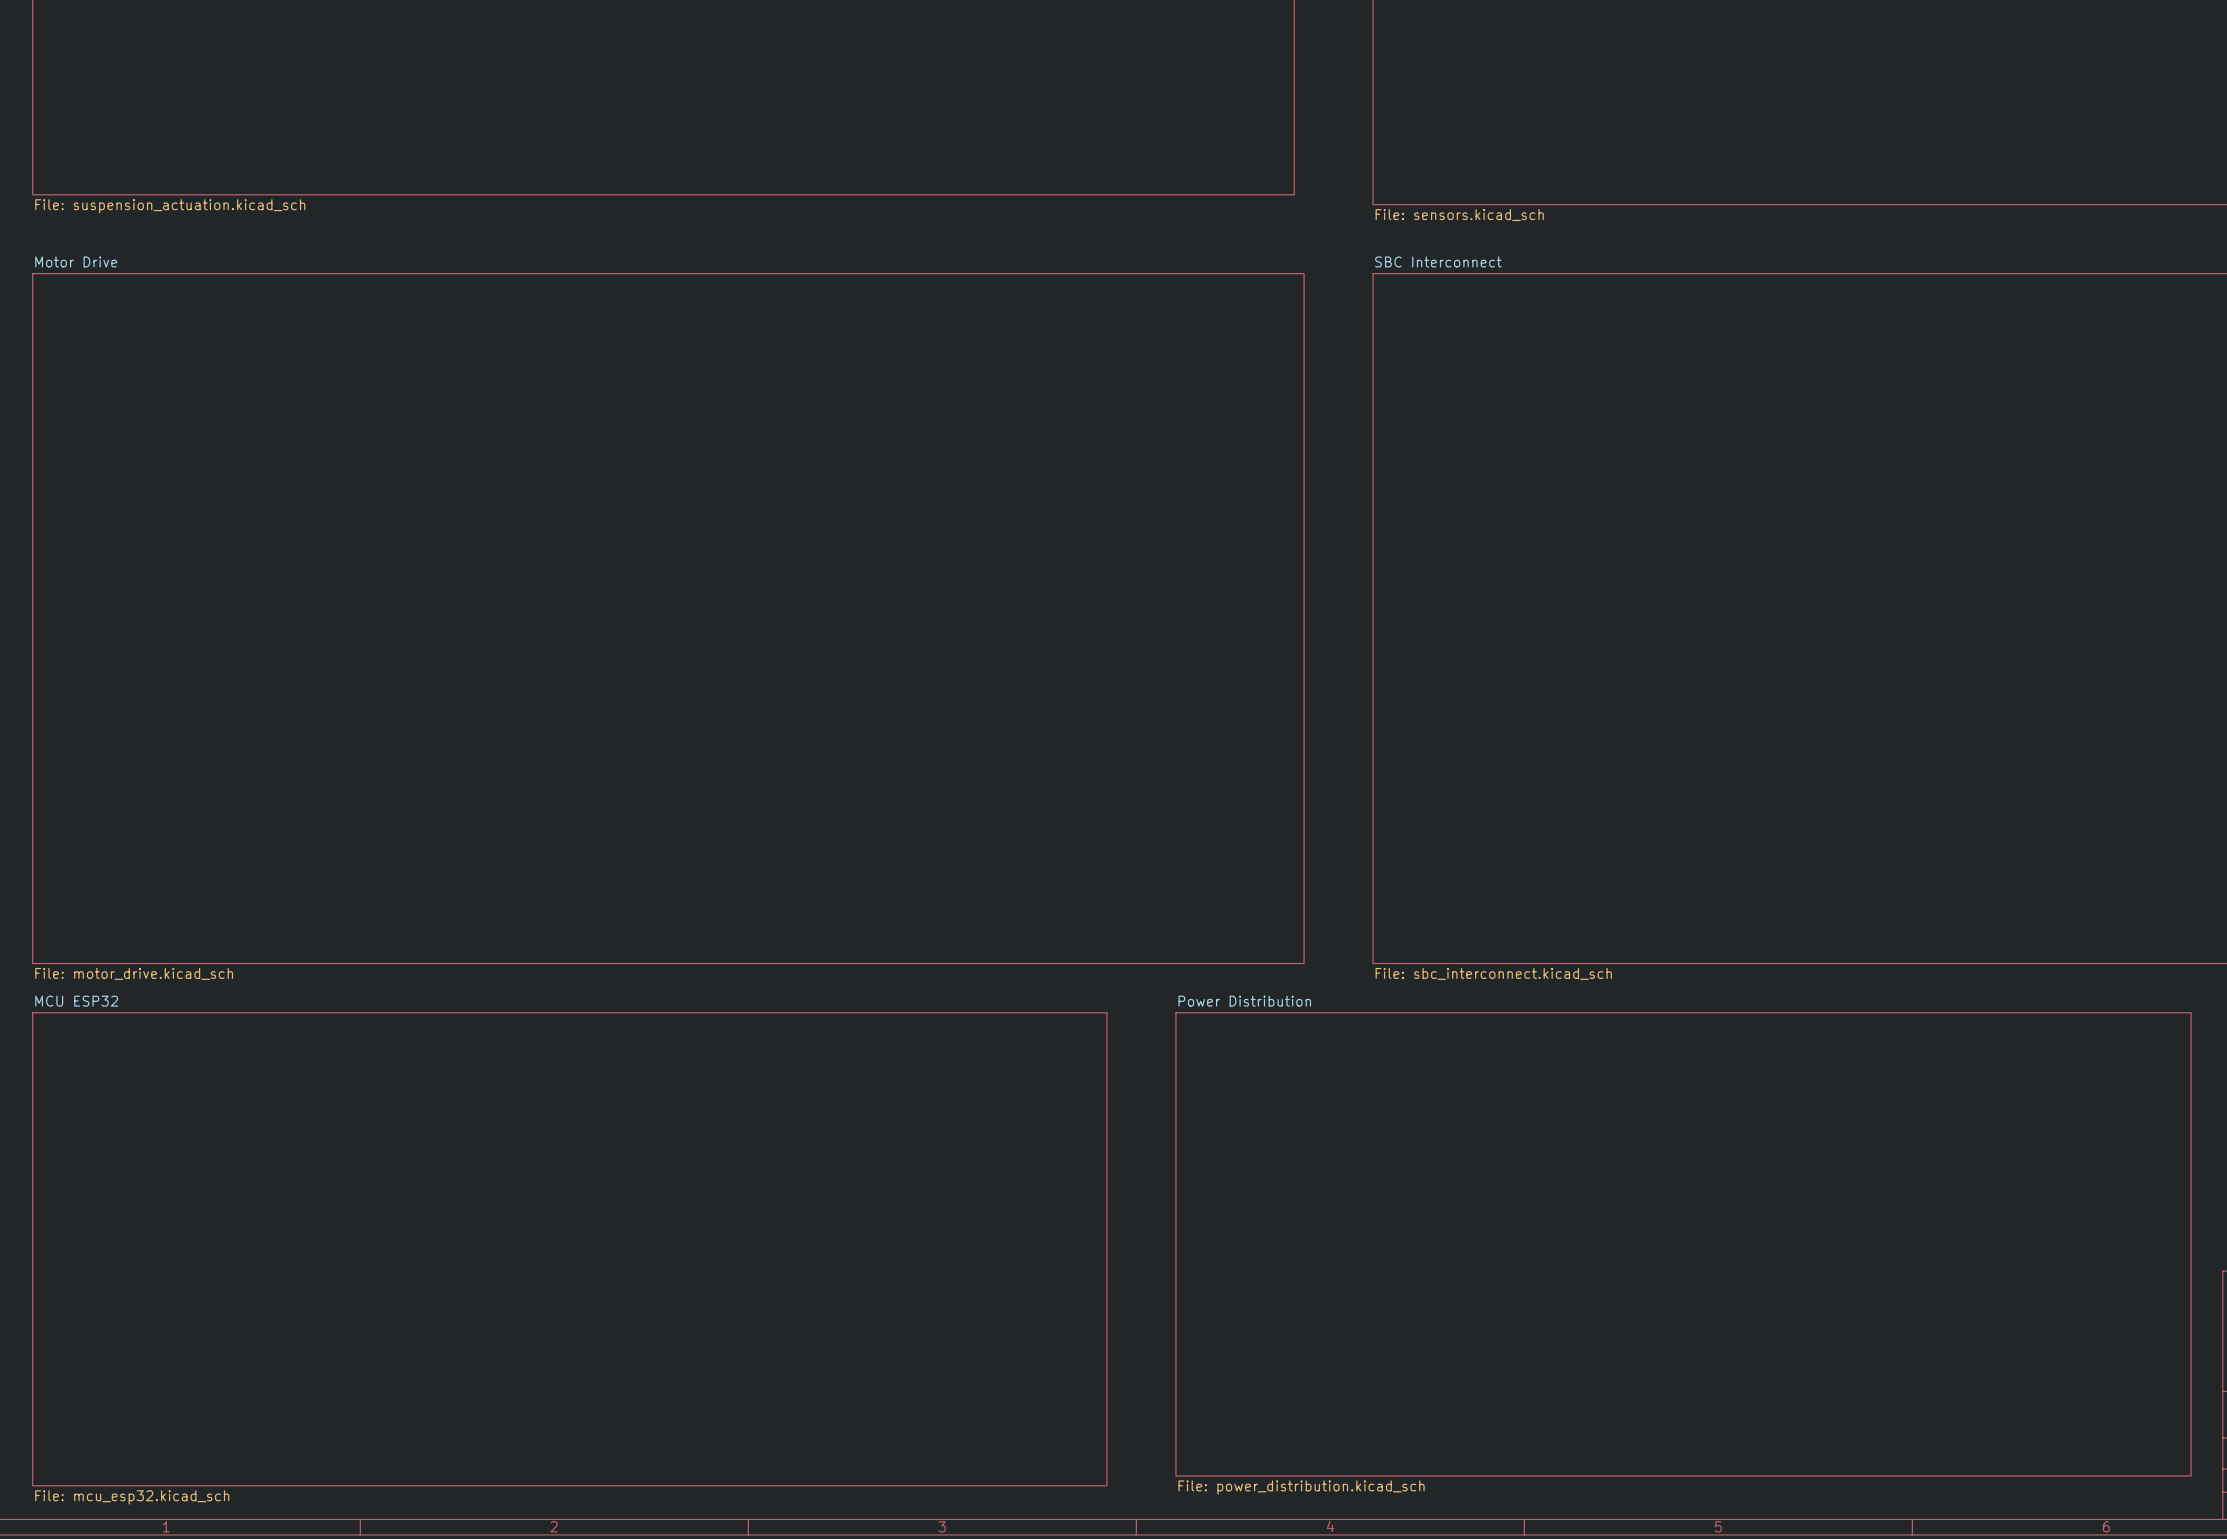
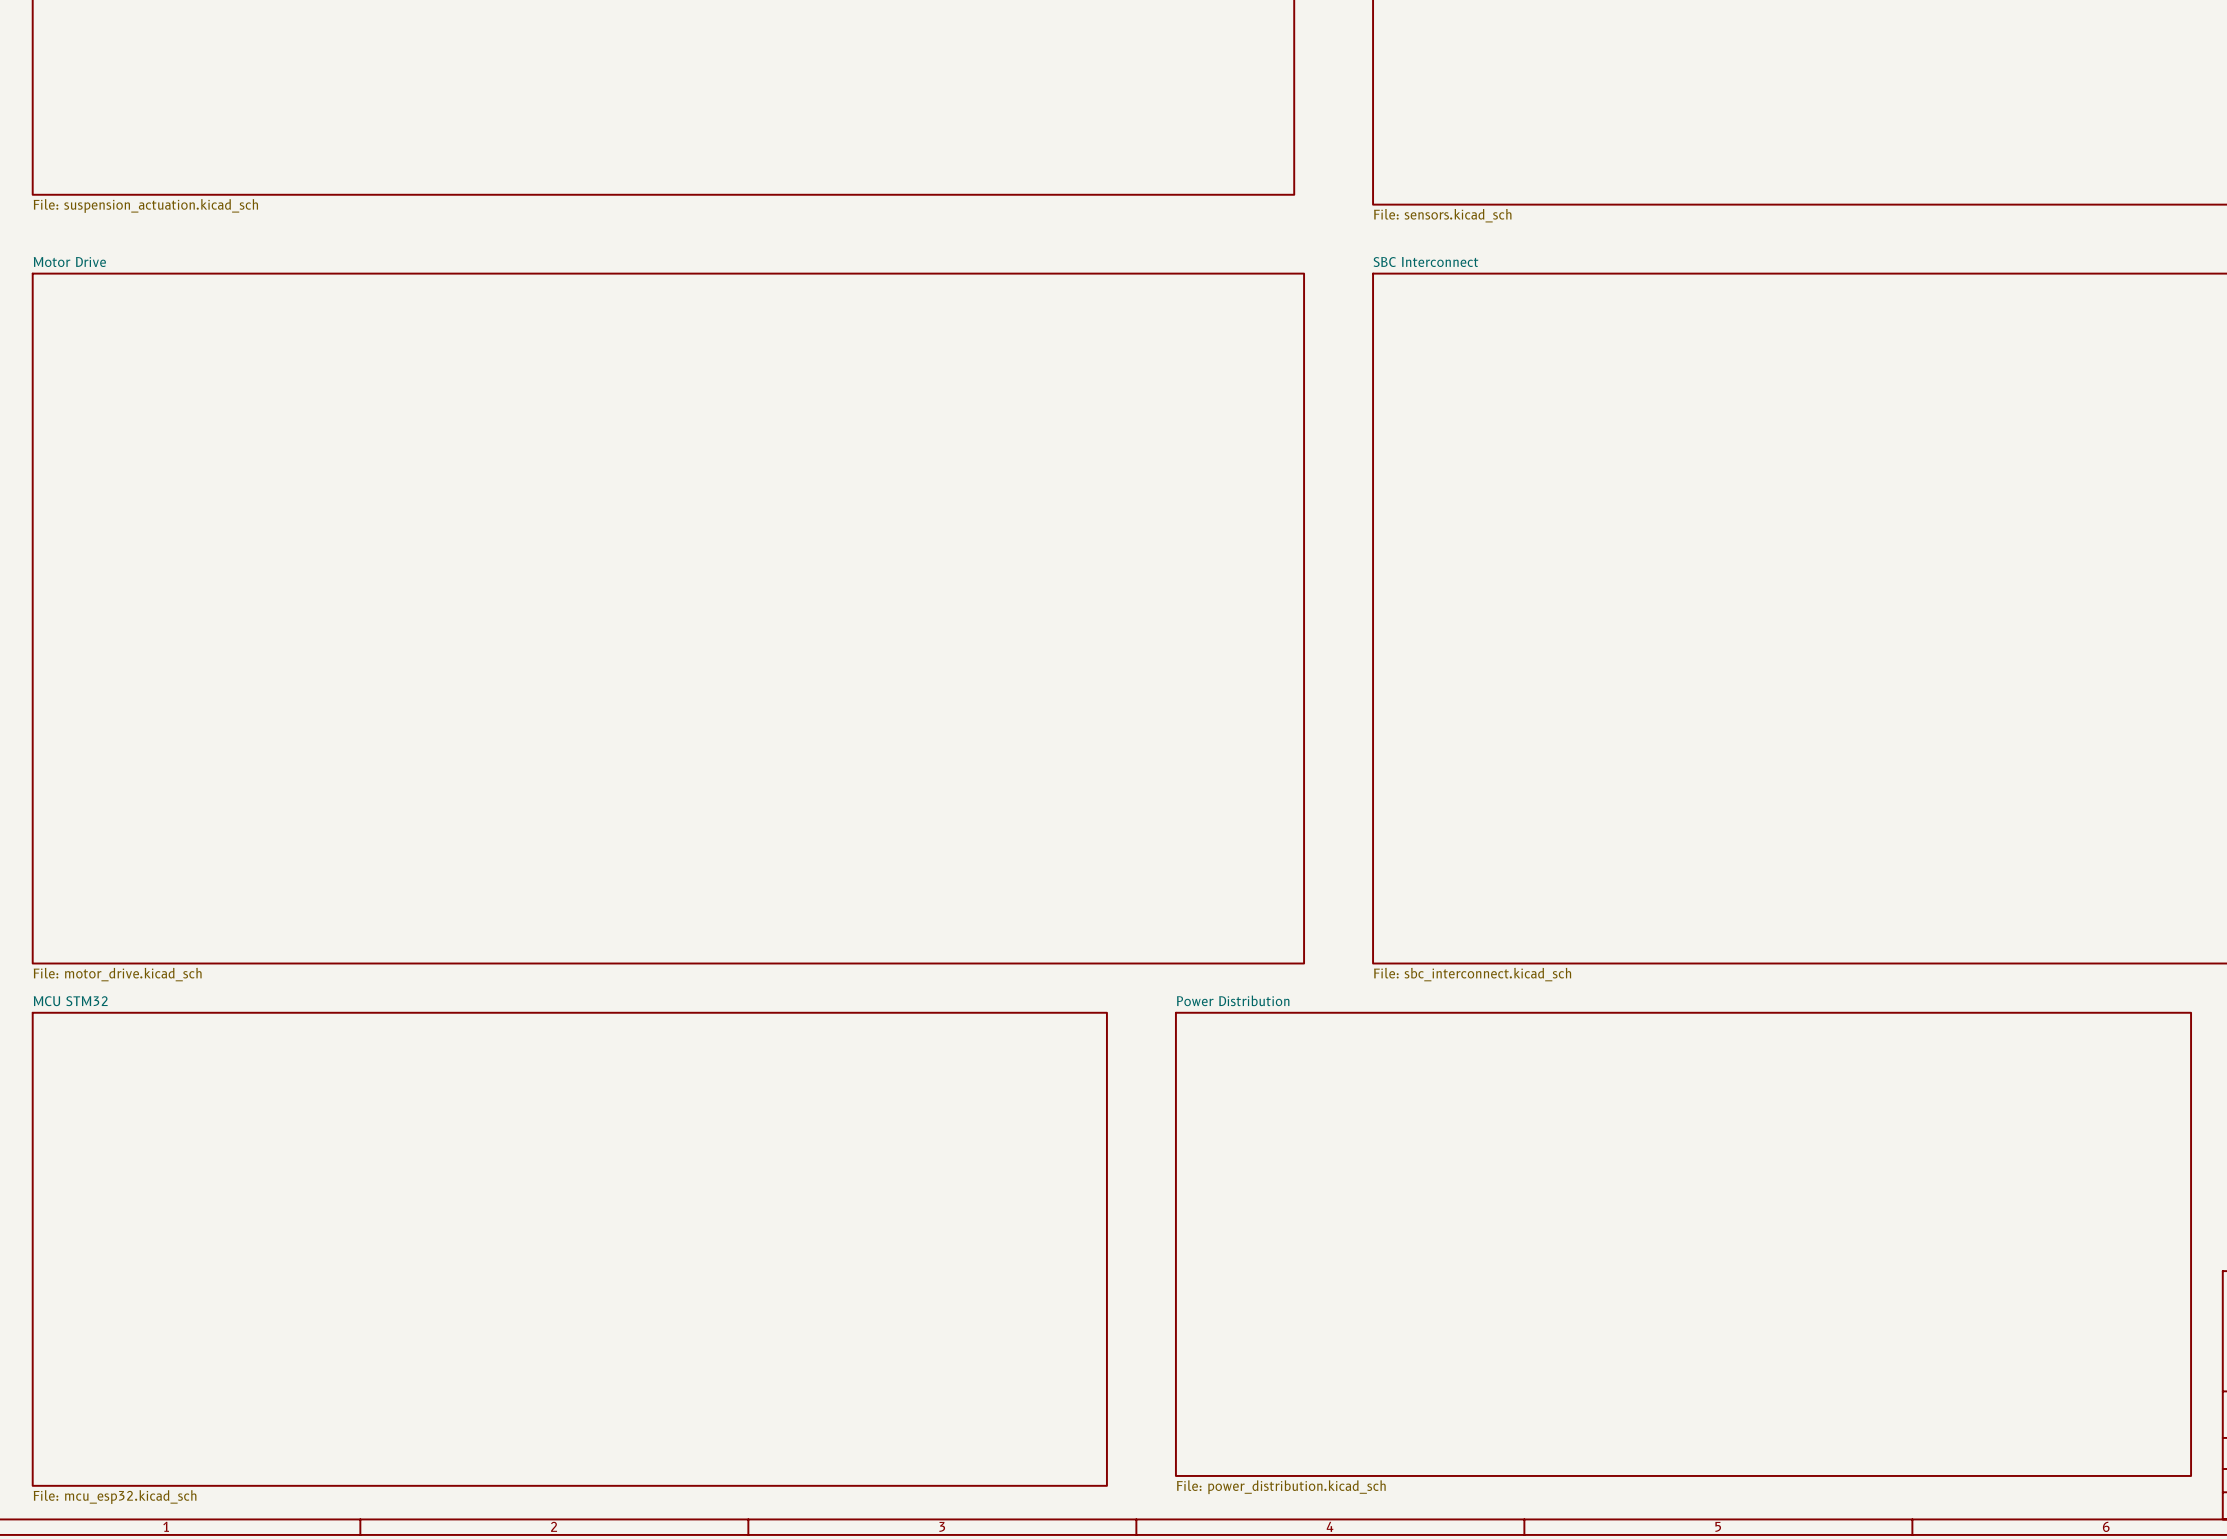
sheet MCU ESP32 name: MCU ESP32 (76, 1001) -> MCU STM32 (70, 1001)

